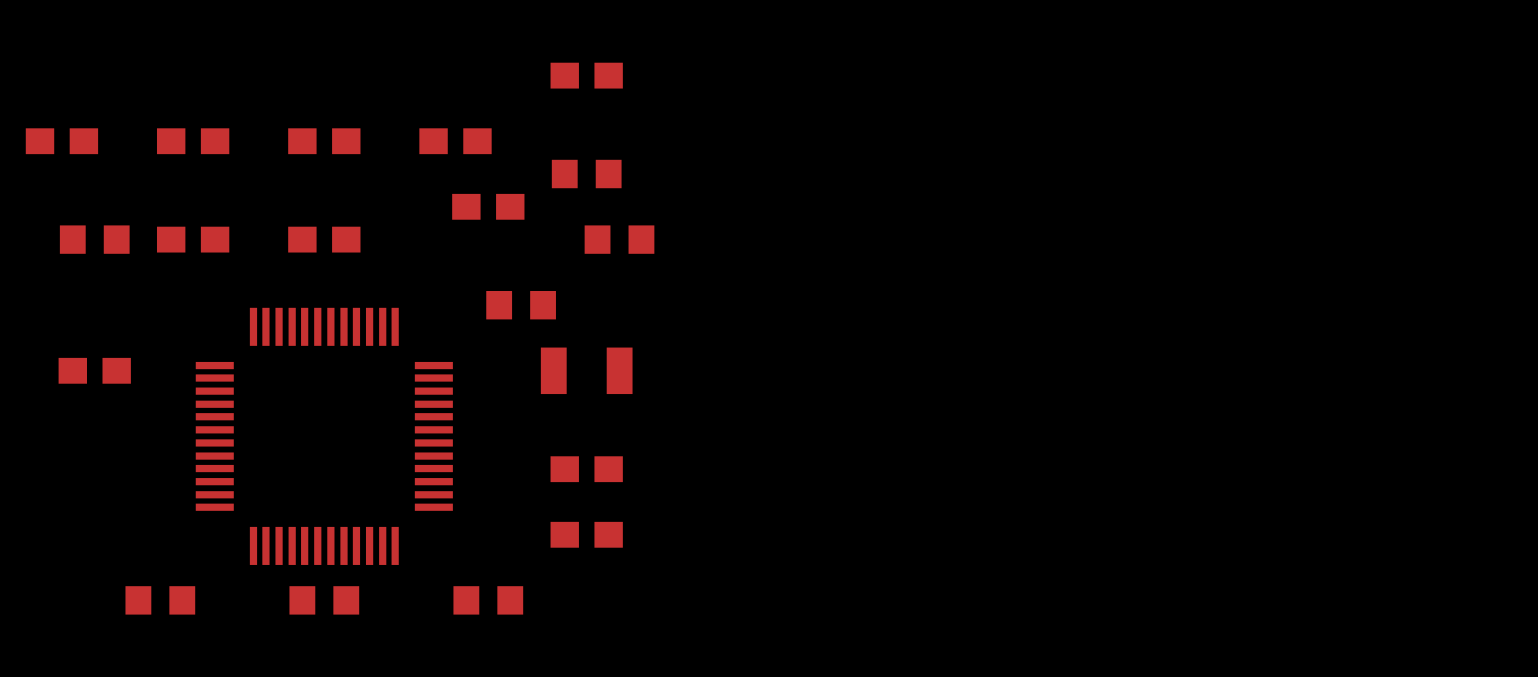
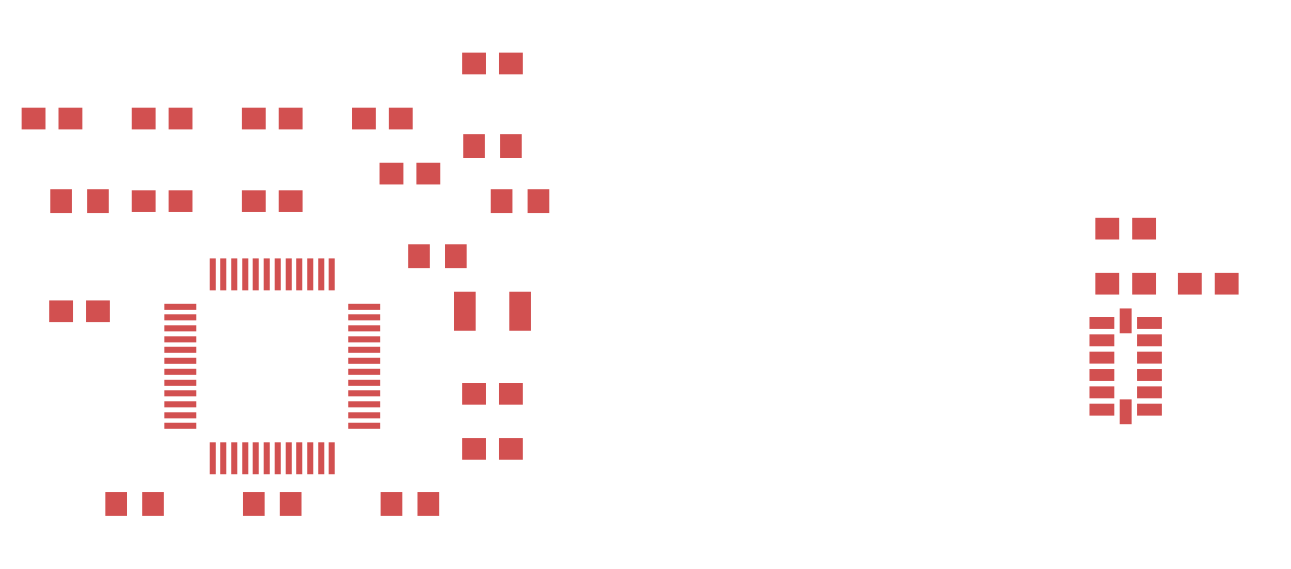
part: none -> (1125, 228)
part: none -> (1125, 283)
part: none -> (1208, 283)
part: none -> (1125, 366)

